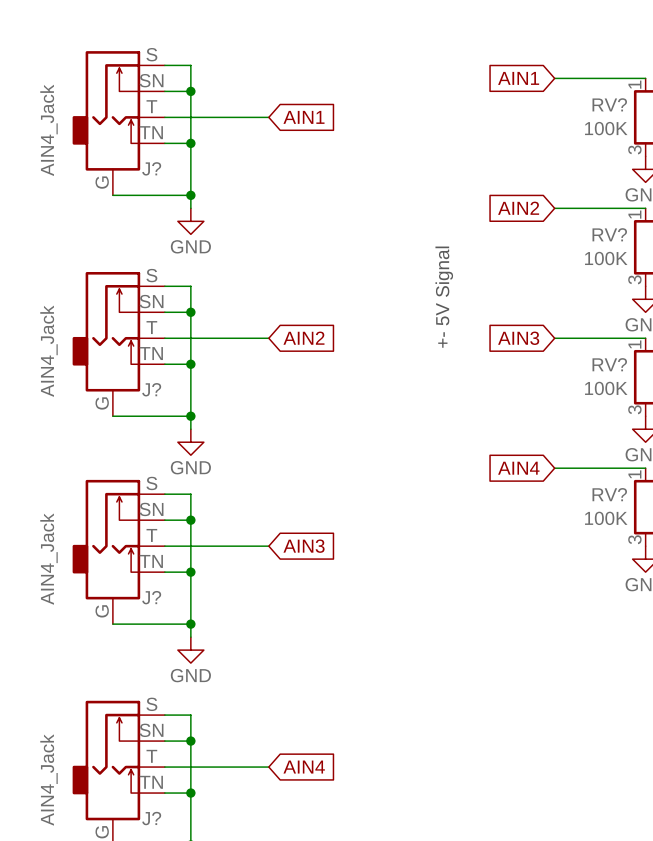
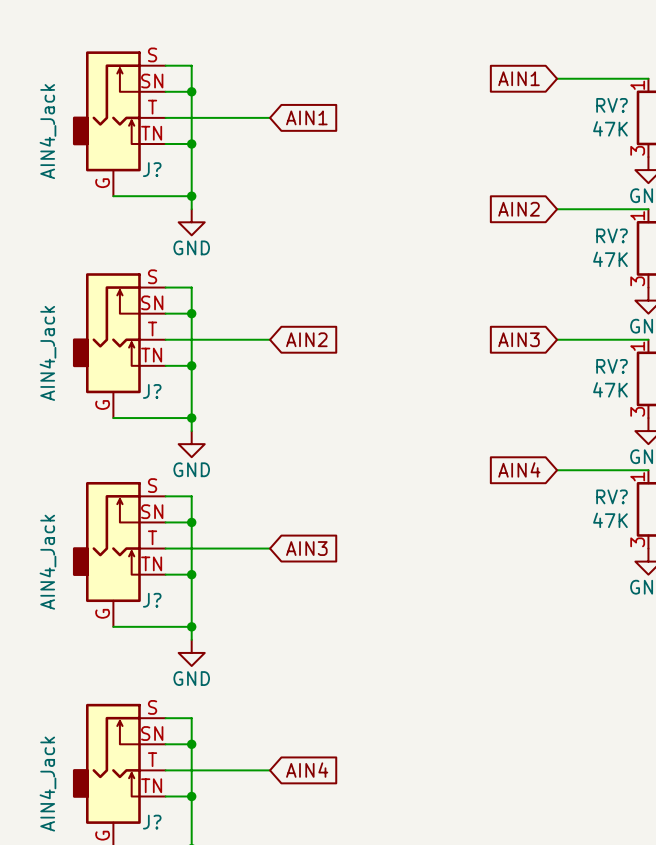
RV? value: 100K (606, 128) -> 47K (610, 128)
RV? value: 100K (606, 258) -> 47K (610, 259)
text: +- 5V Signal (444, 297) -> none
RV? value: 100K (606, 388) -> 47K (610, 389)
RV? value: 100K (606, 518) -> 47K (610, 520)

